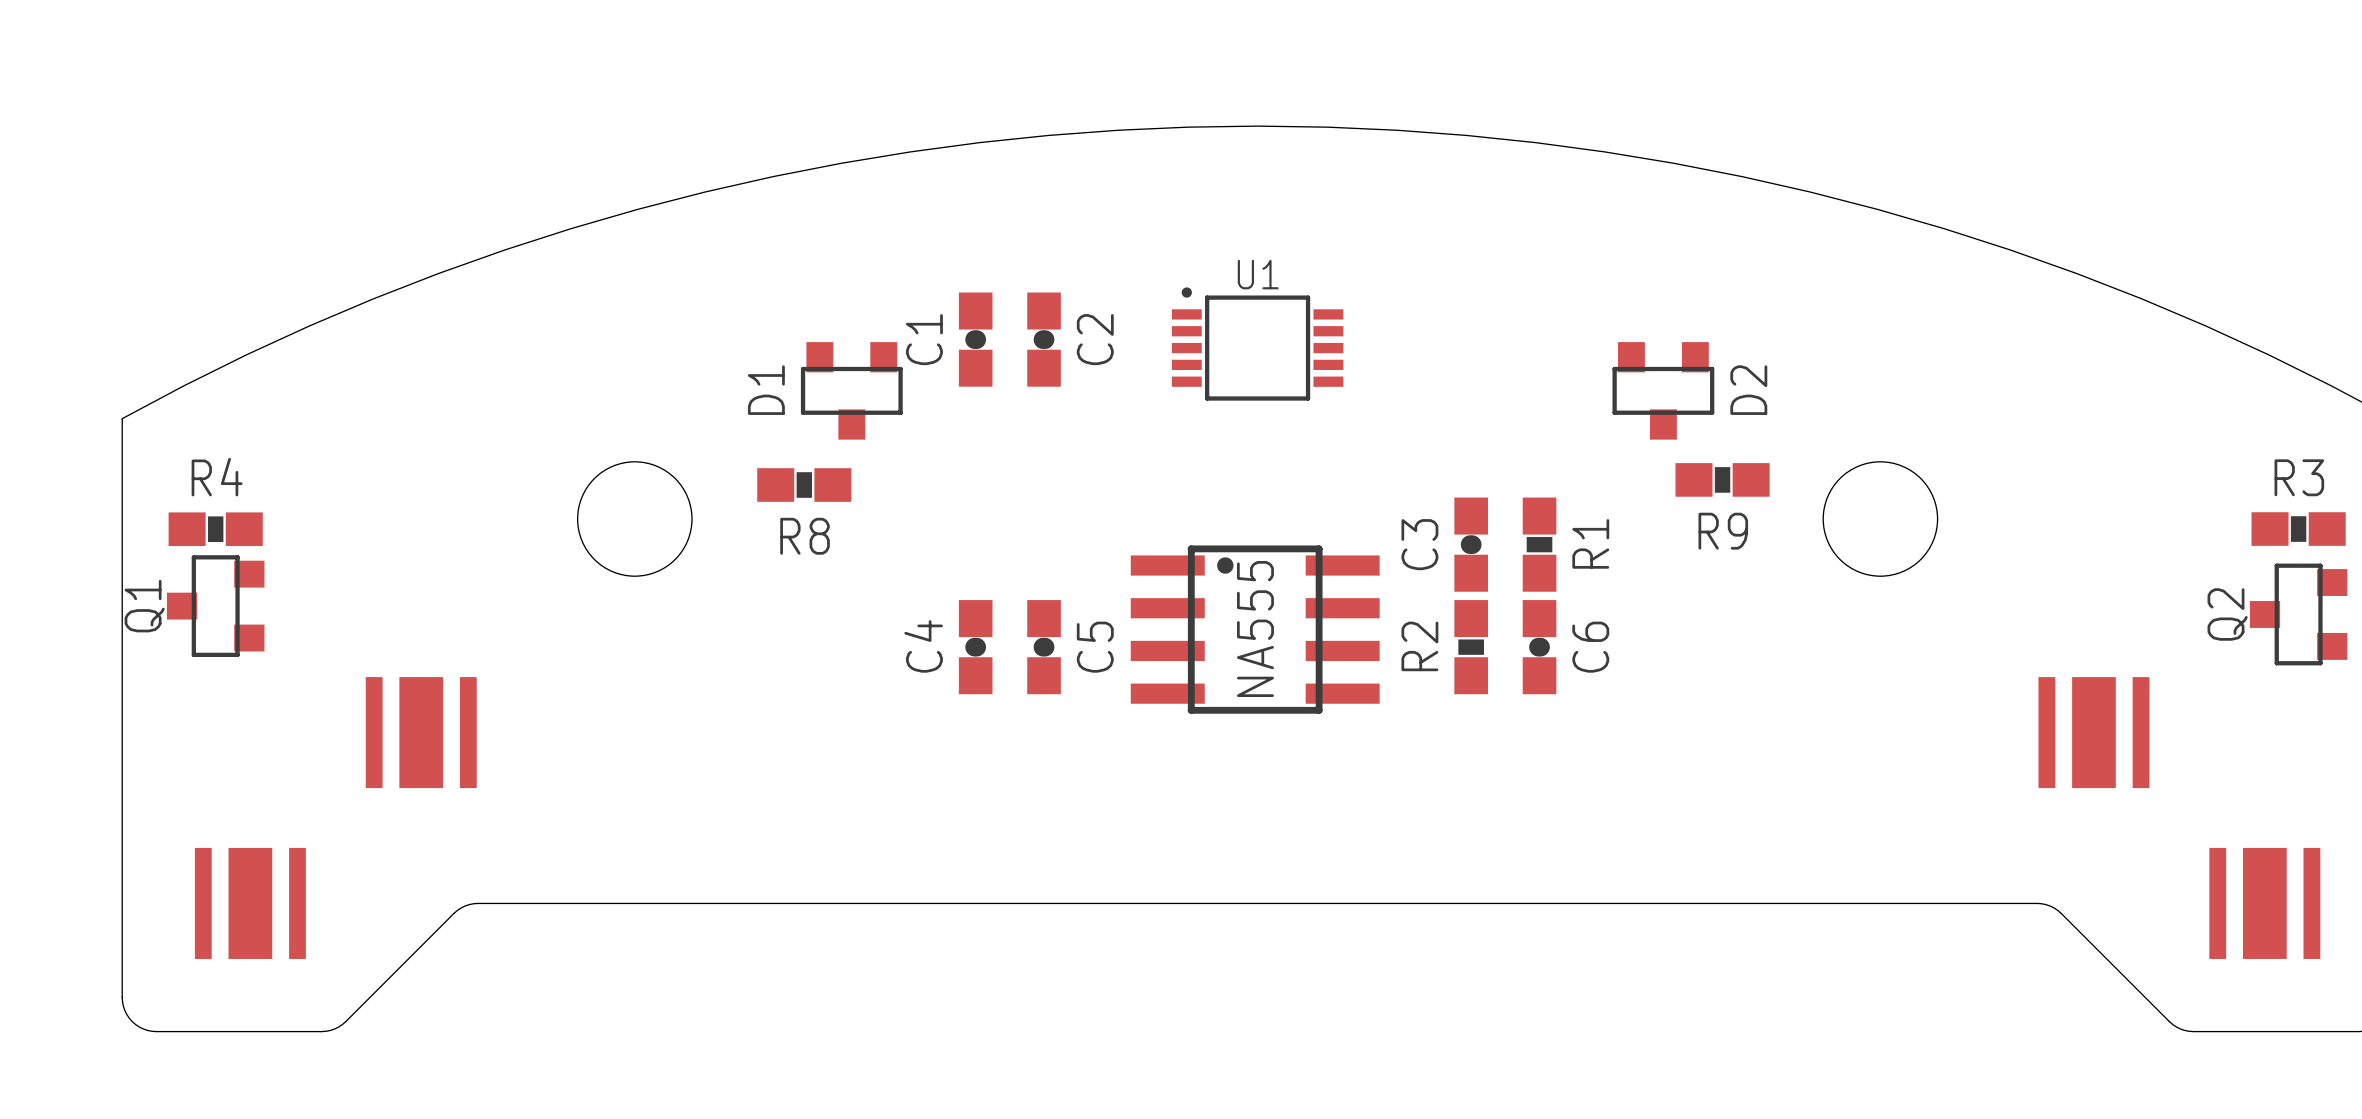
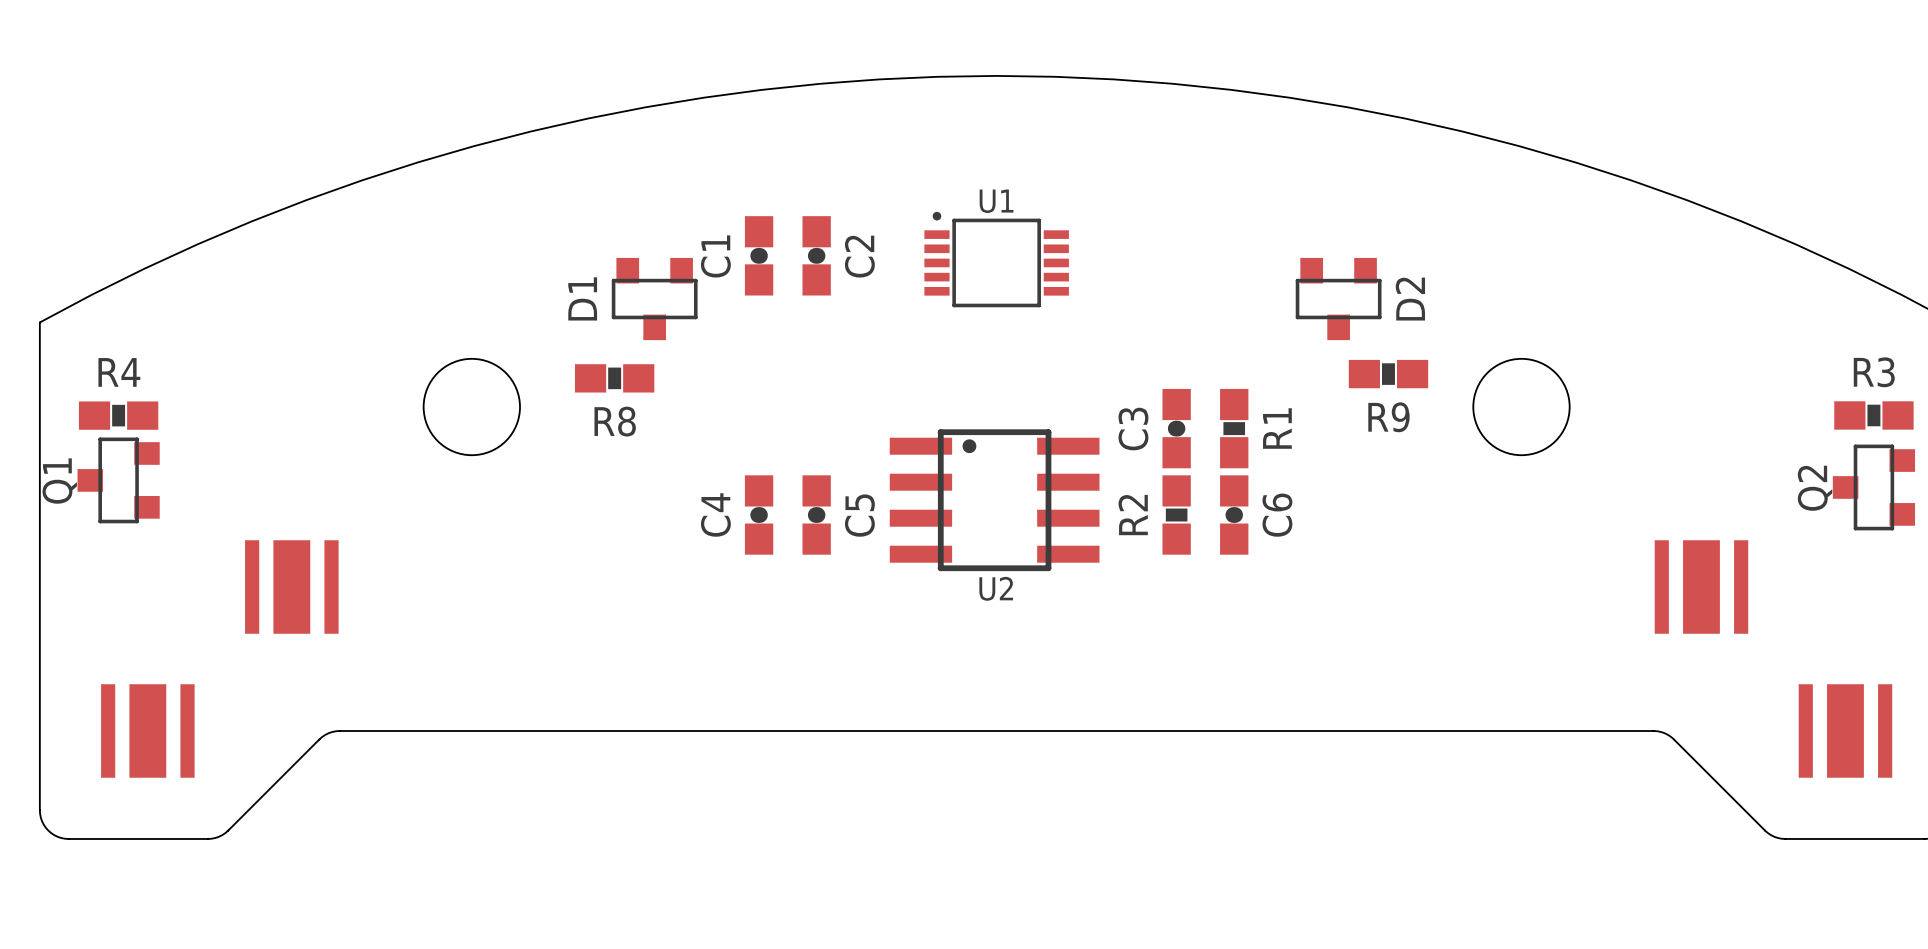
NA555 name: NA555 (1255, 628) -> U2 (996, 588)

